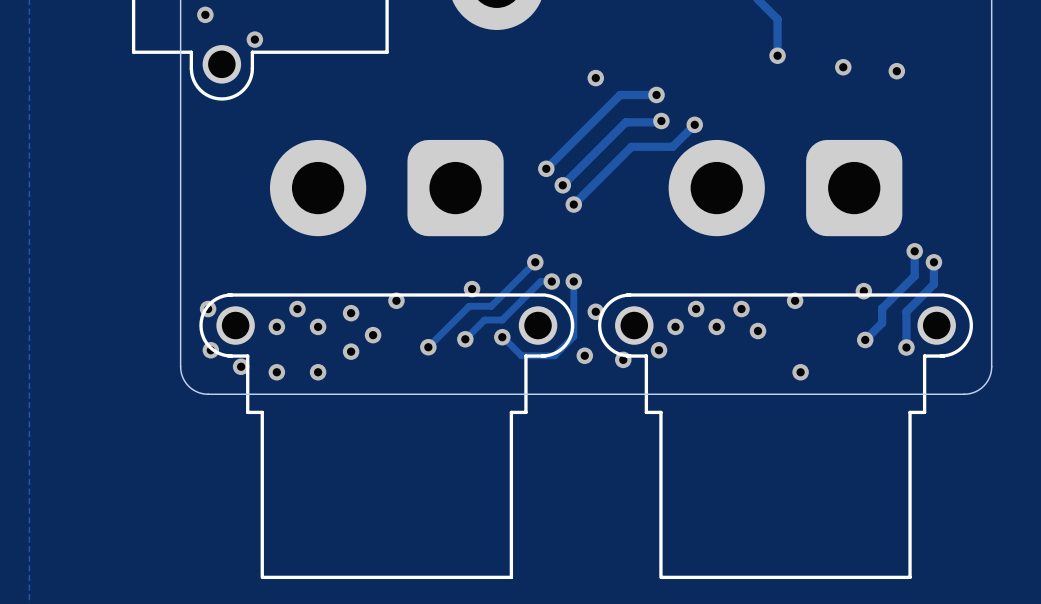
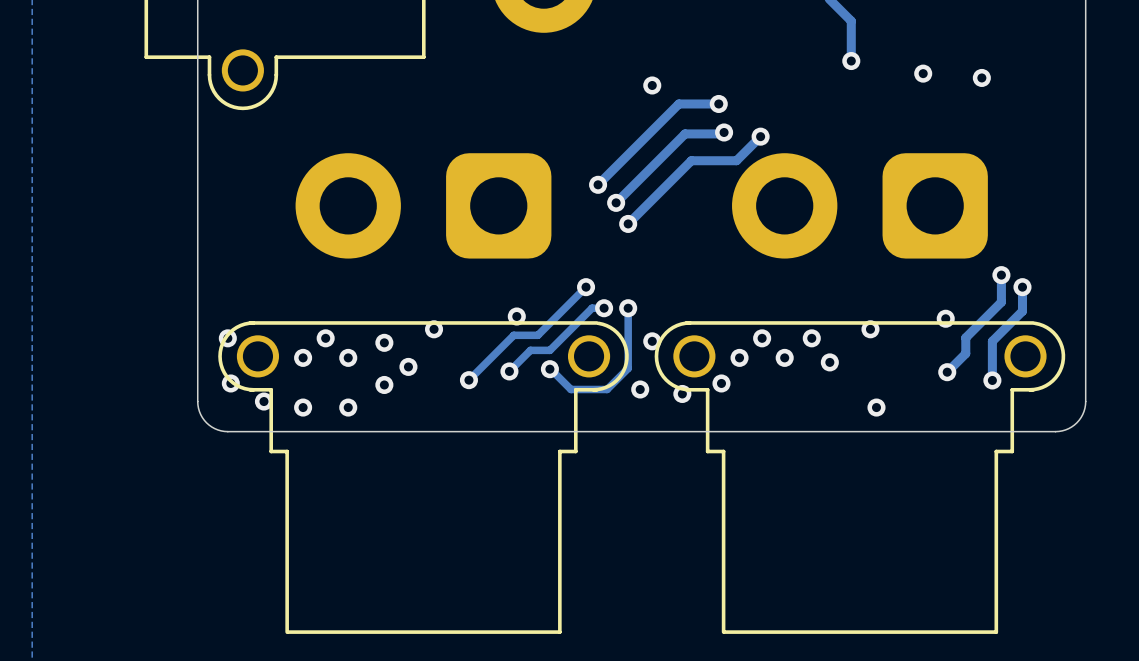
via: (205, 14) -> none
via: (254, 39) -> none

